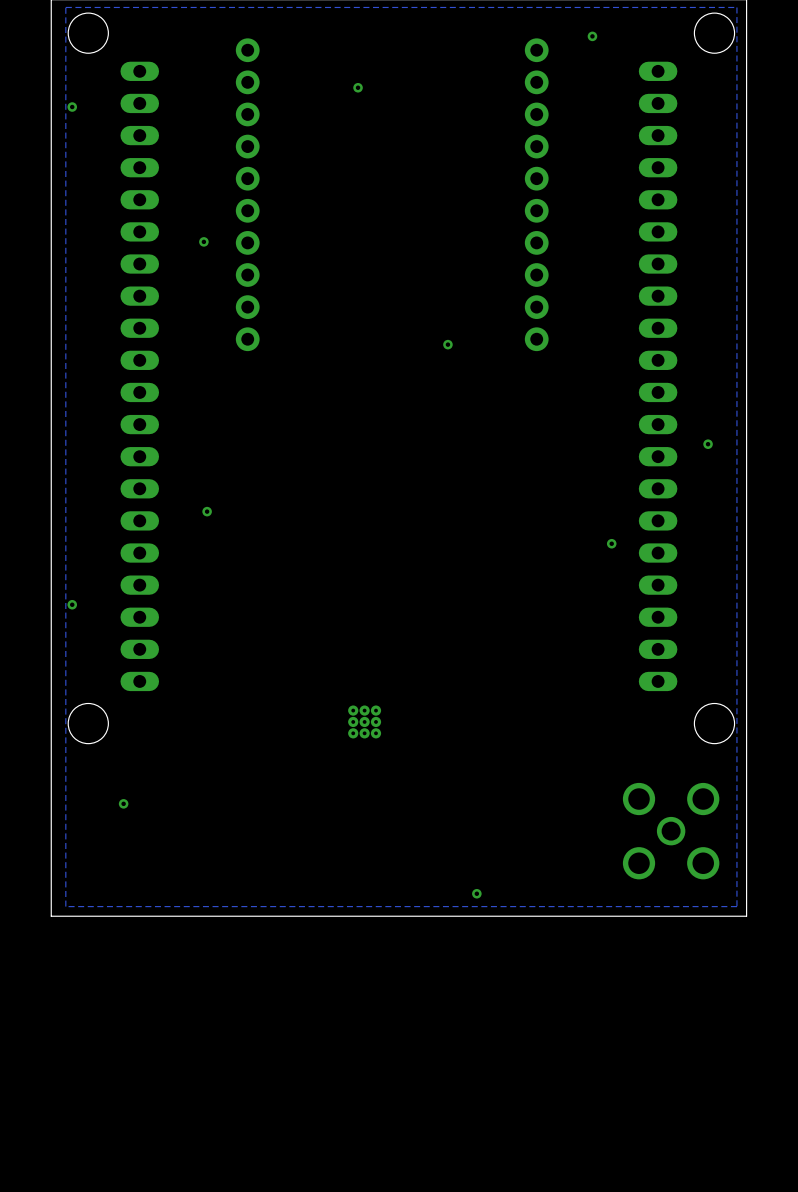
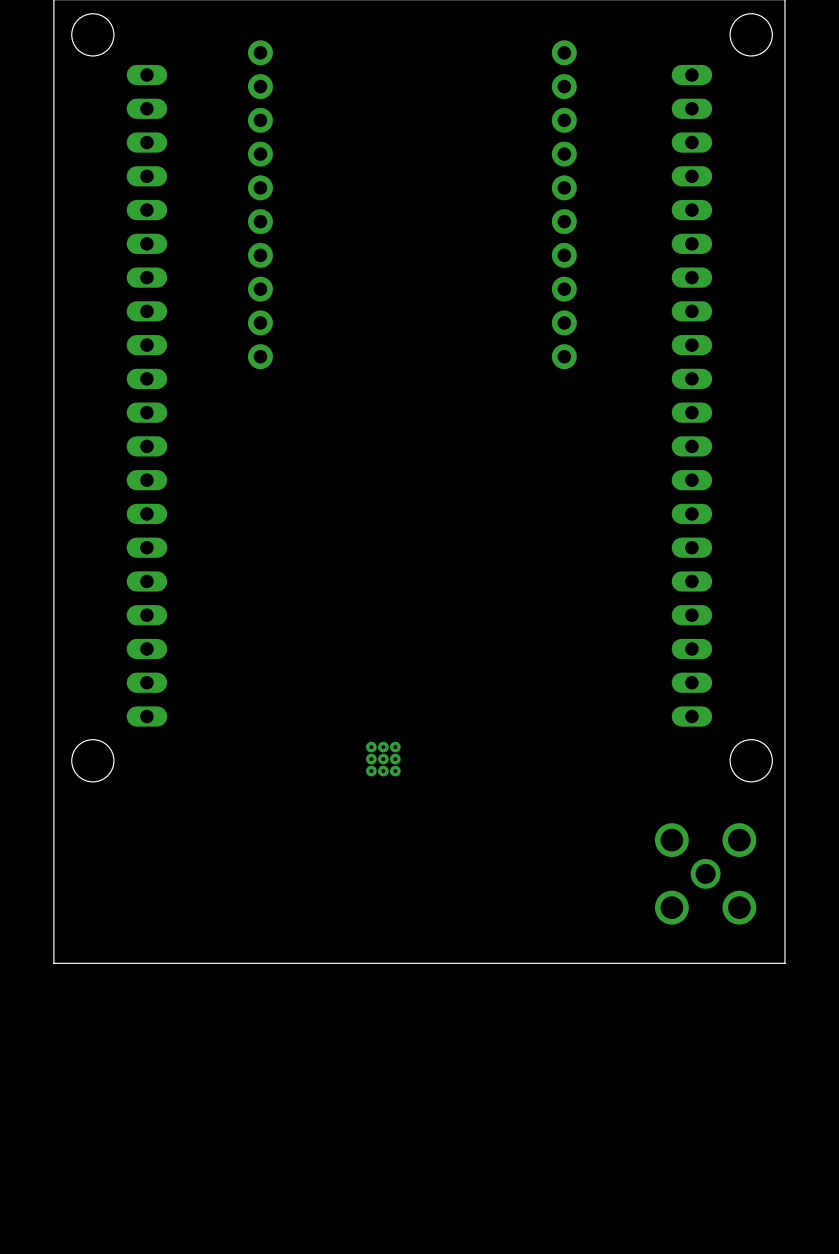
zone outline: (736, 7) (736, 906) (65, 906) (65, 7) (736, 7) -> none
via: (592, 36) -> none
via: (358, 87) -> none
via: (72, 107) -> none
via: (203, 241) -> none
via: (447, 344) -> none
via: (708, 444) -> none
via: (207, 511) -> none
via: (611, 543) -> none
via: (72, 604) -> none
via: (123, 803) -> none
via: (476, 893) -> none

